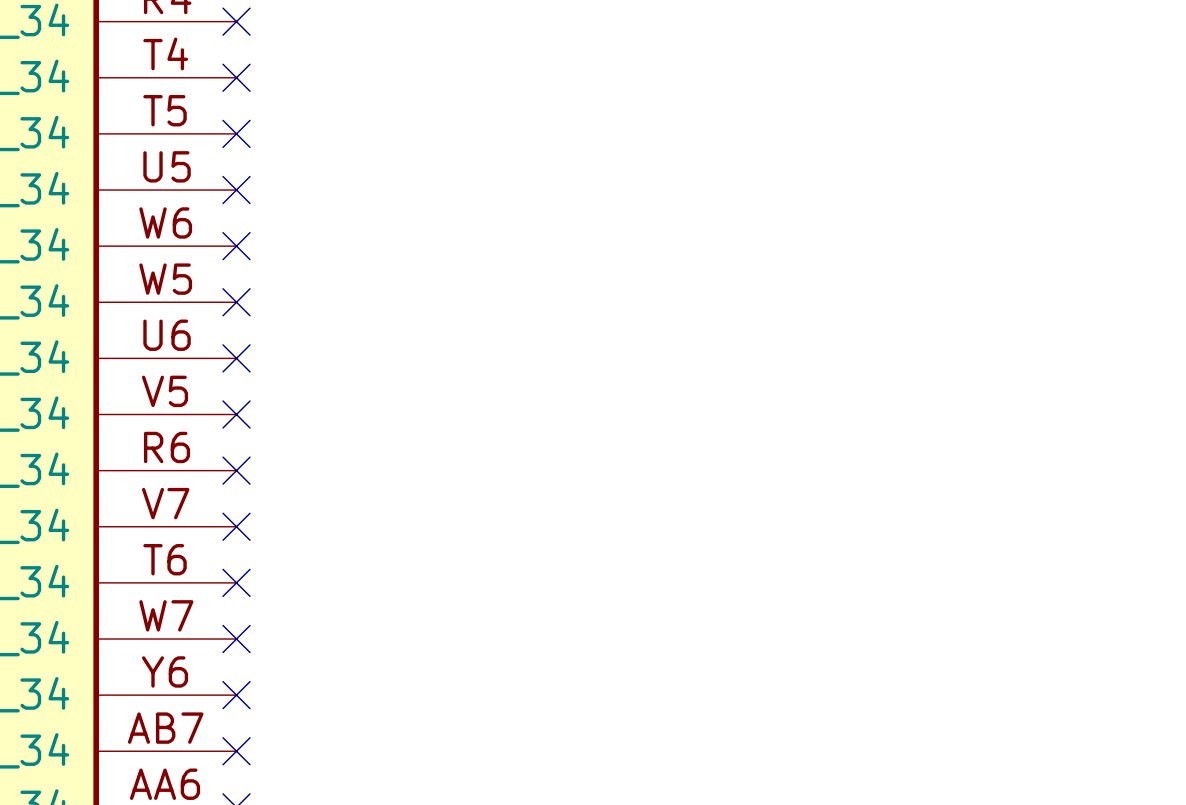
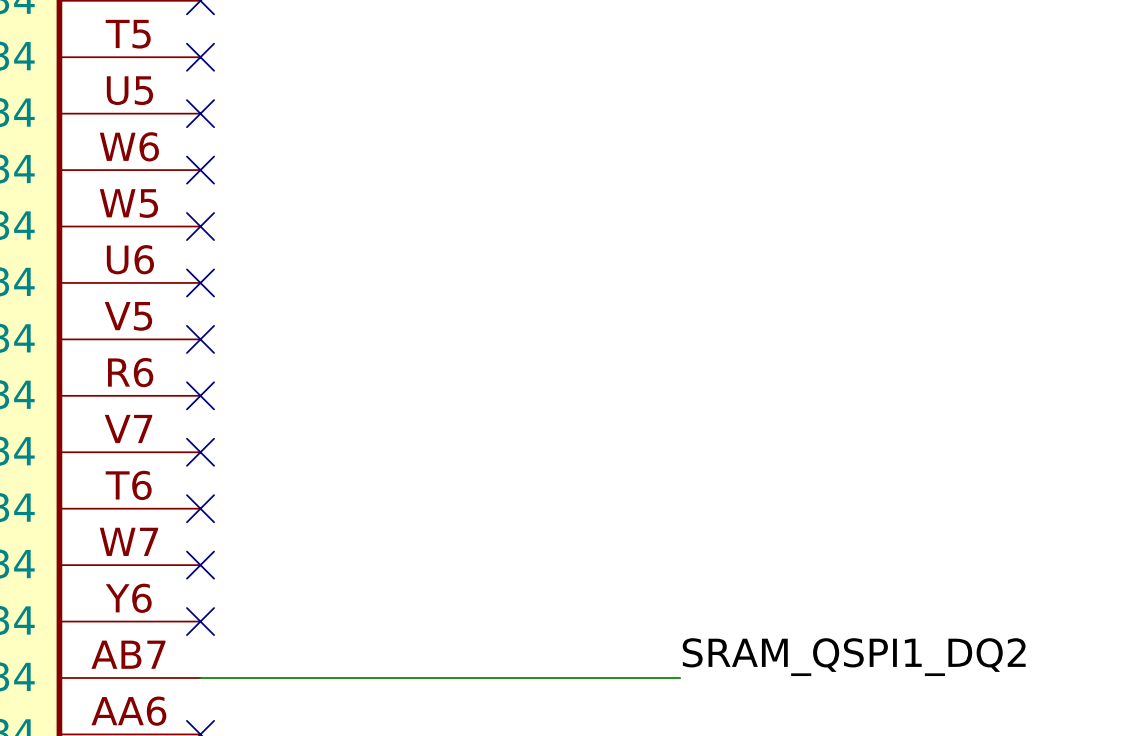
label: none -> SRAM_QSPI1_DQ2 (854, 657)
wire: none -> (200, 677) (680, 677)
no-connect mark: (236, 751) -> none

